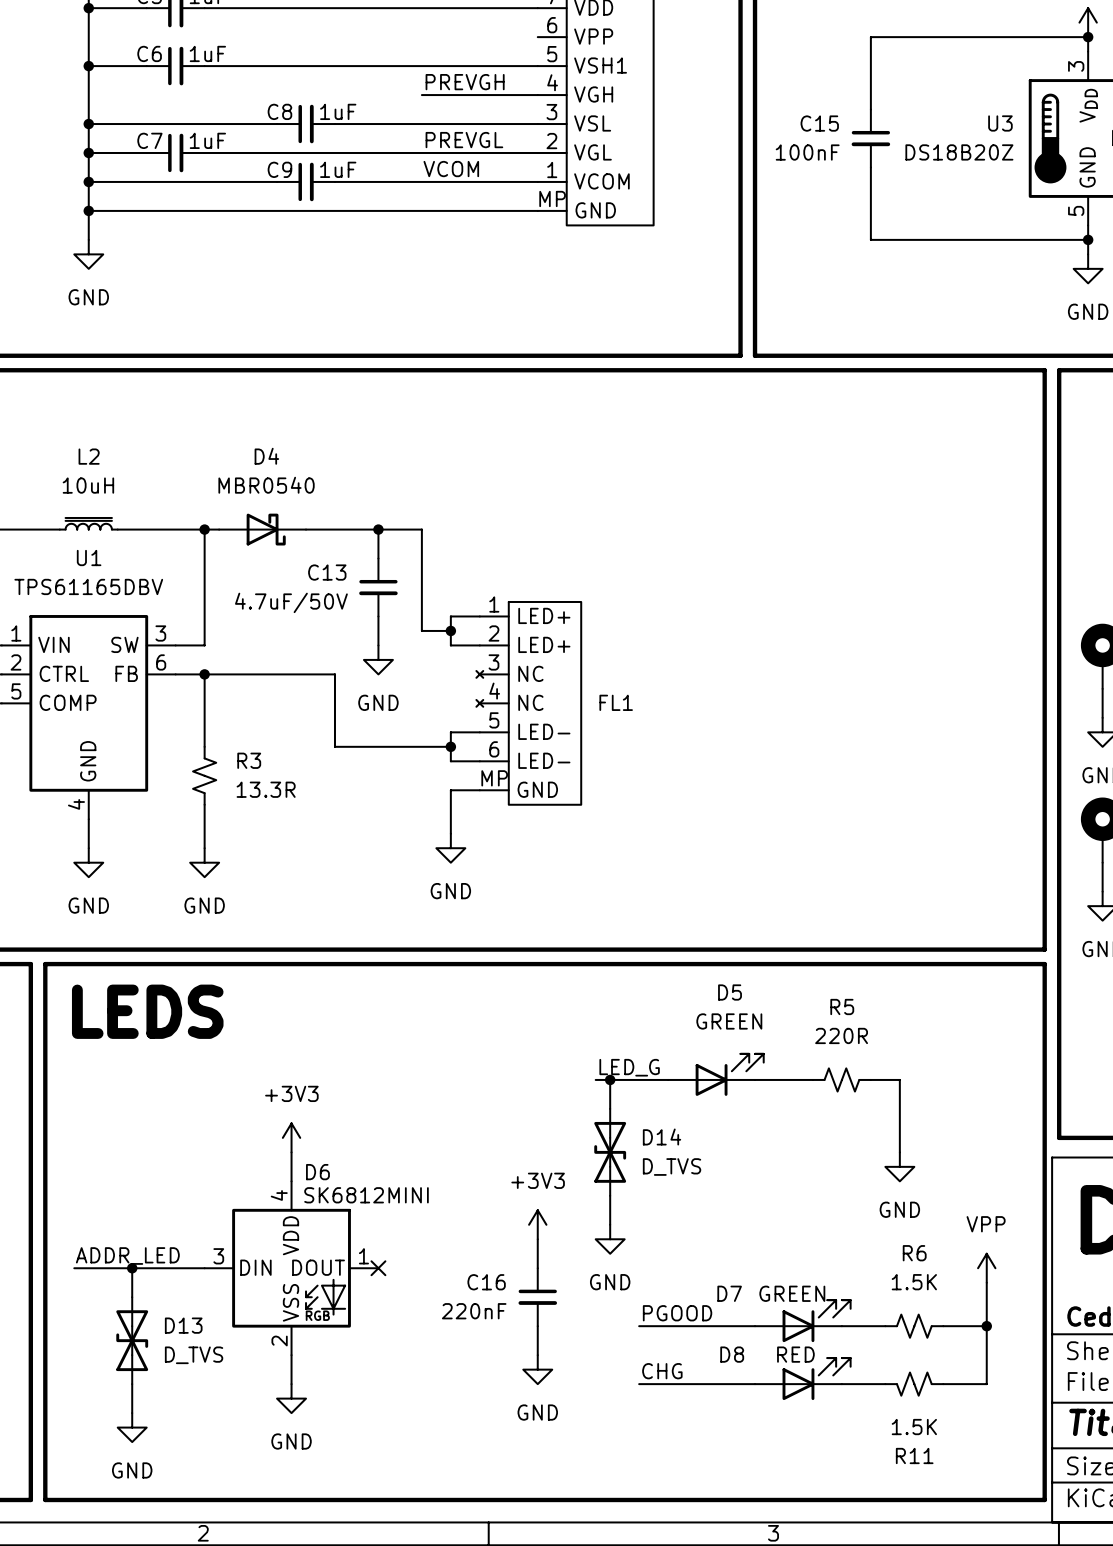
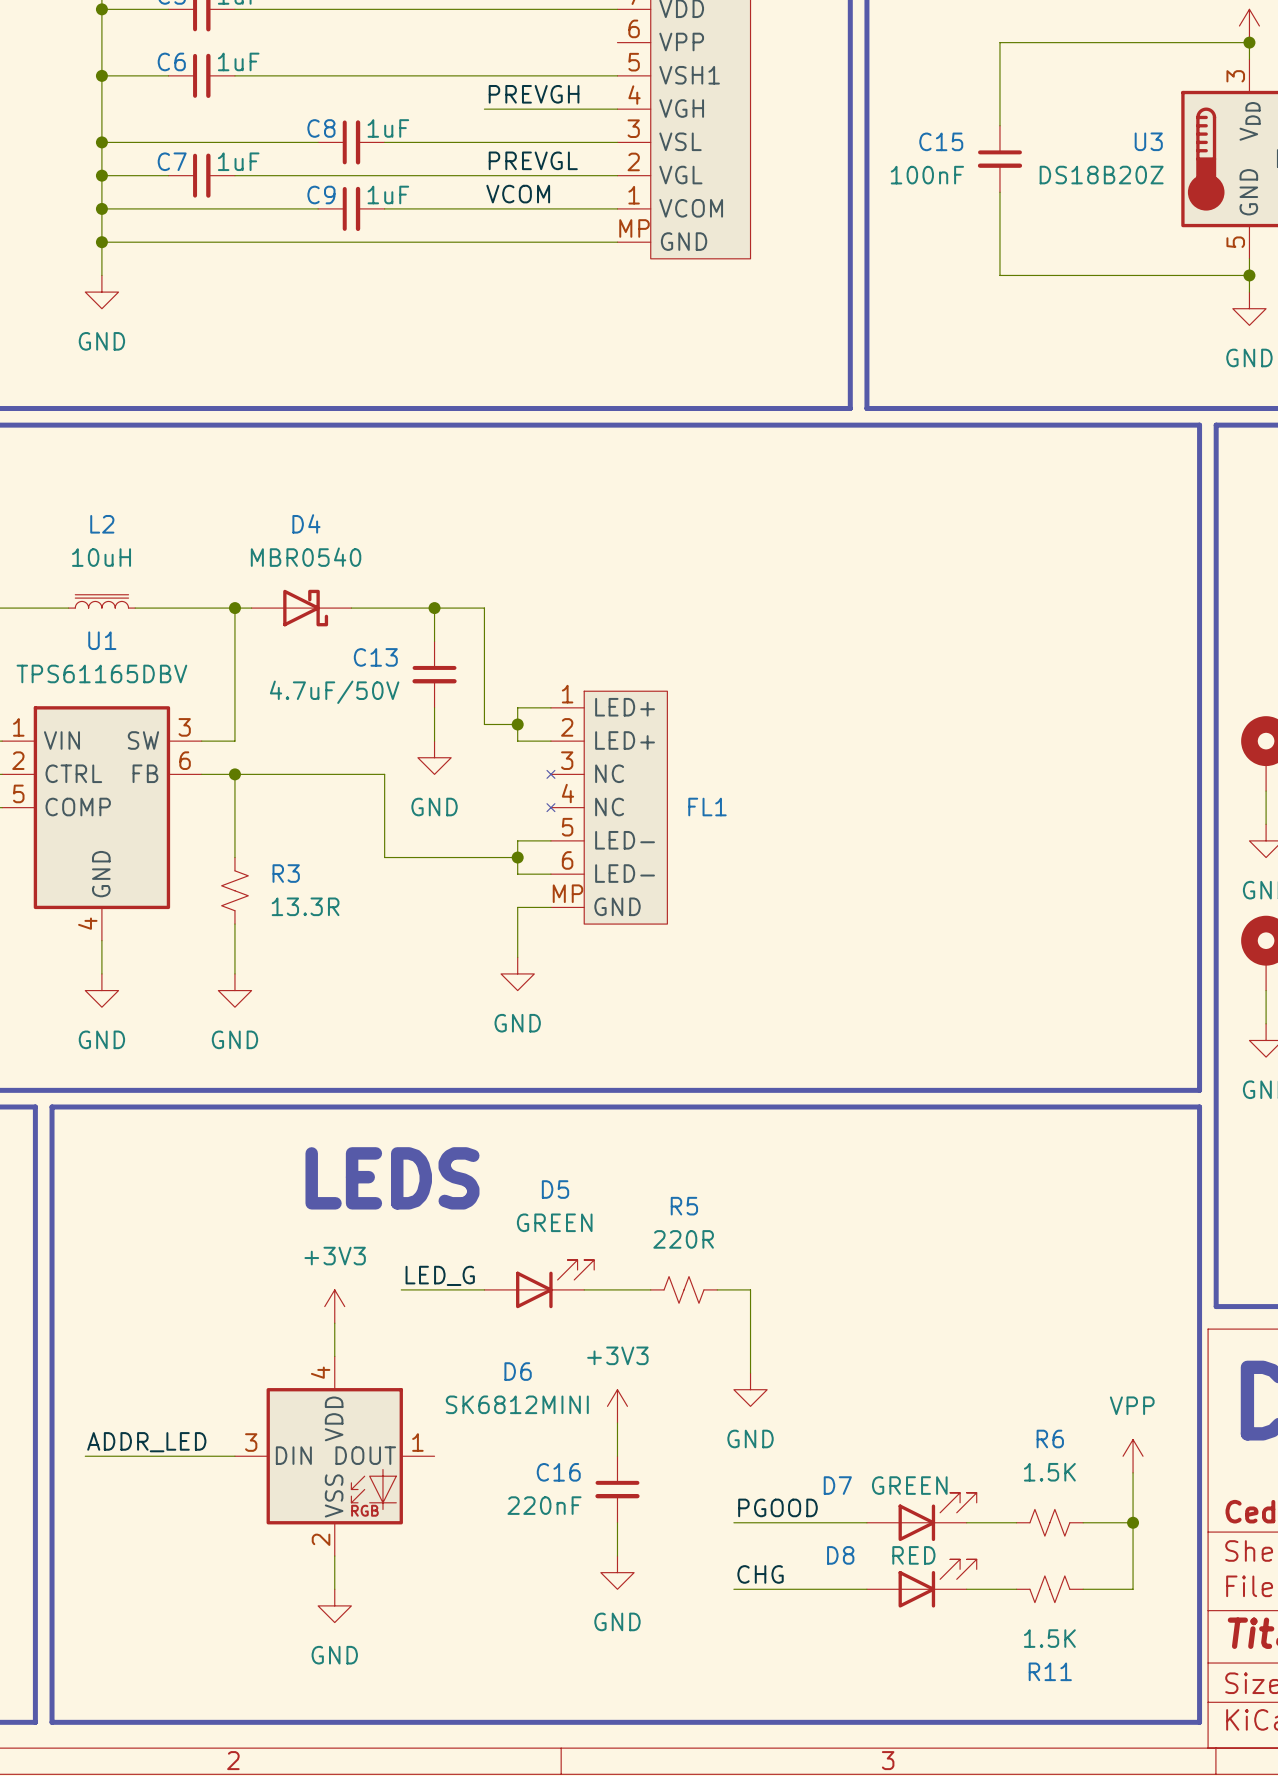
text position: LEDS (147, 1011) -> LEDS (392, 1178)
label position: LED_G (629, 1067) -> LED_G (440, 1275)
D5 position: (715, 1074) -> (539, 1284)
wire: (595, 1079) (668, 1079) -> (401, 1289) (484, 1289)
wire: (610, 1079) (610, 1108) -> none
junction: (610, 1079) -> none
wire: (755, 1079) (812, 1079) -> (584, 1289) (650, 1289)
R5 position: (841, 1079) -> (684, 1289)
wire: (870, 1079) (899, 1079) (899, 1152) -> (717, 1289) (750, 1289) (750, 1373)
D14: D_TVS (610, 1152) -> none
power symbol: GND (899, 1166) -> none
D6 name position: D6 (317, 1172) -> D6 (518, 1371)
D6 value position: SK6812MINI (366, 1195) -> SK6812MINI (517, 1404)
wire: (610, 1195) (610, 1224) -> none
power symbol position: GND (610, 1239) -> GND (750, 1389)
wire: (132, 1268) (132, 1297) -> none
junction: (132, 1268) -> none
no-connect mark: (378, 1268) -> none
D13: D_TVS (132, 1340) -> none
wire: (132, 1384) (132, 1413) -> none
power symbol: GND (132, 1427) -> none

